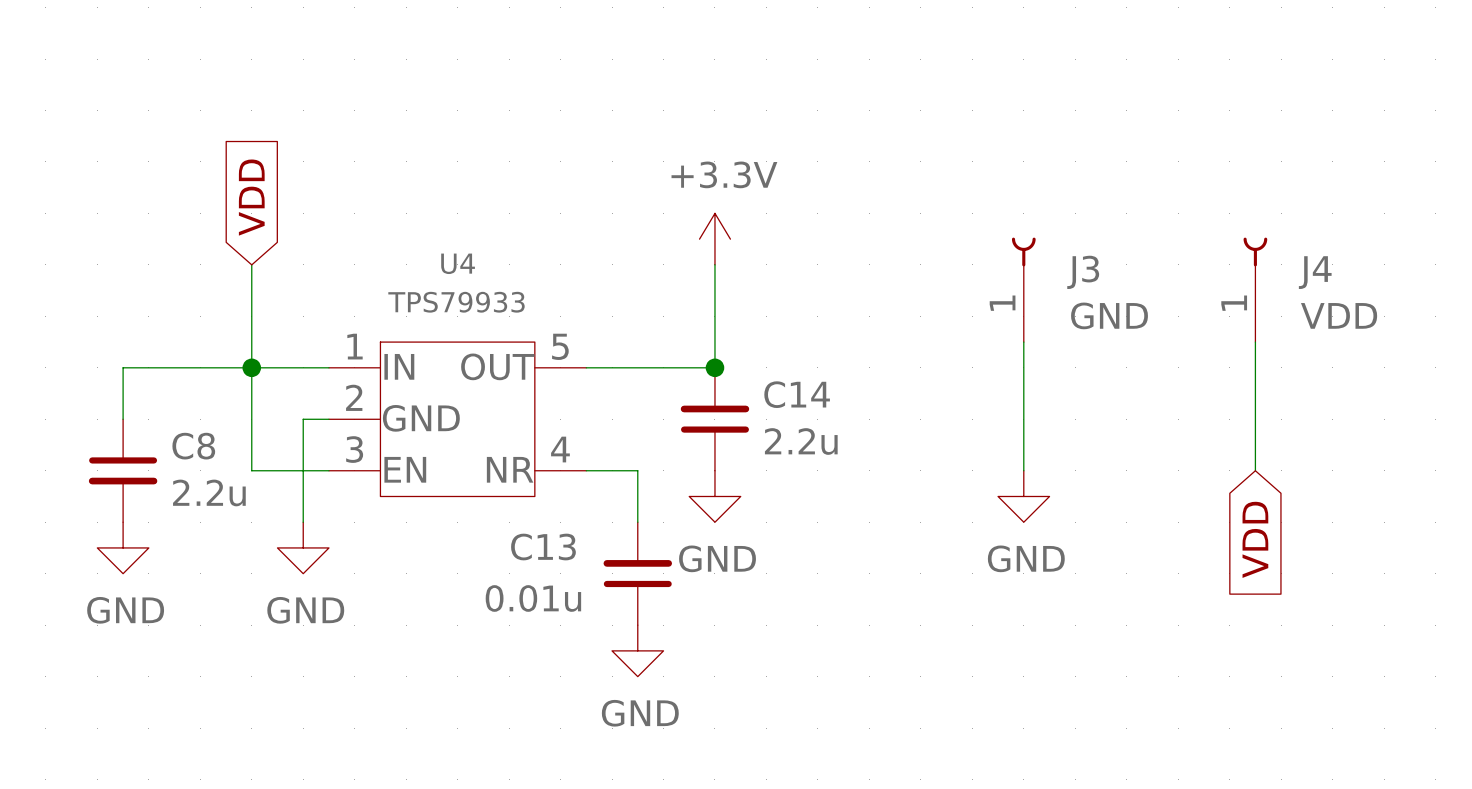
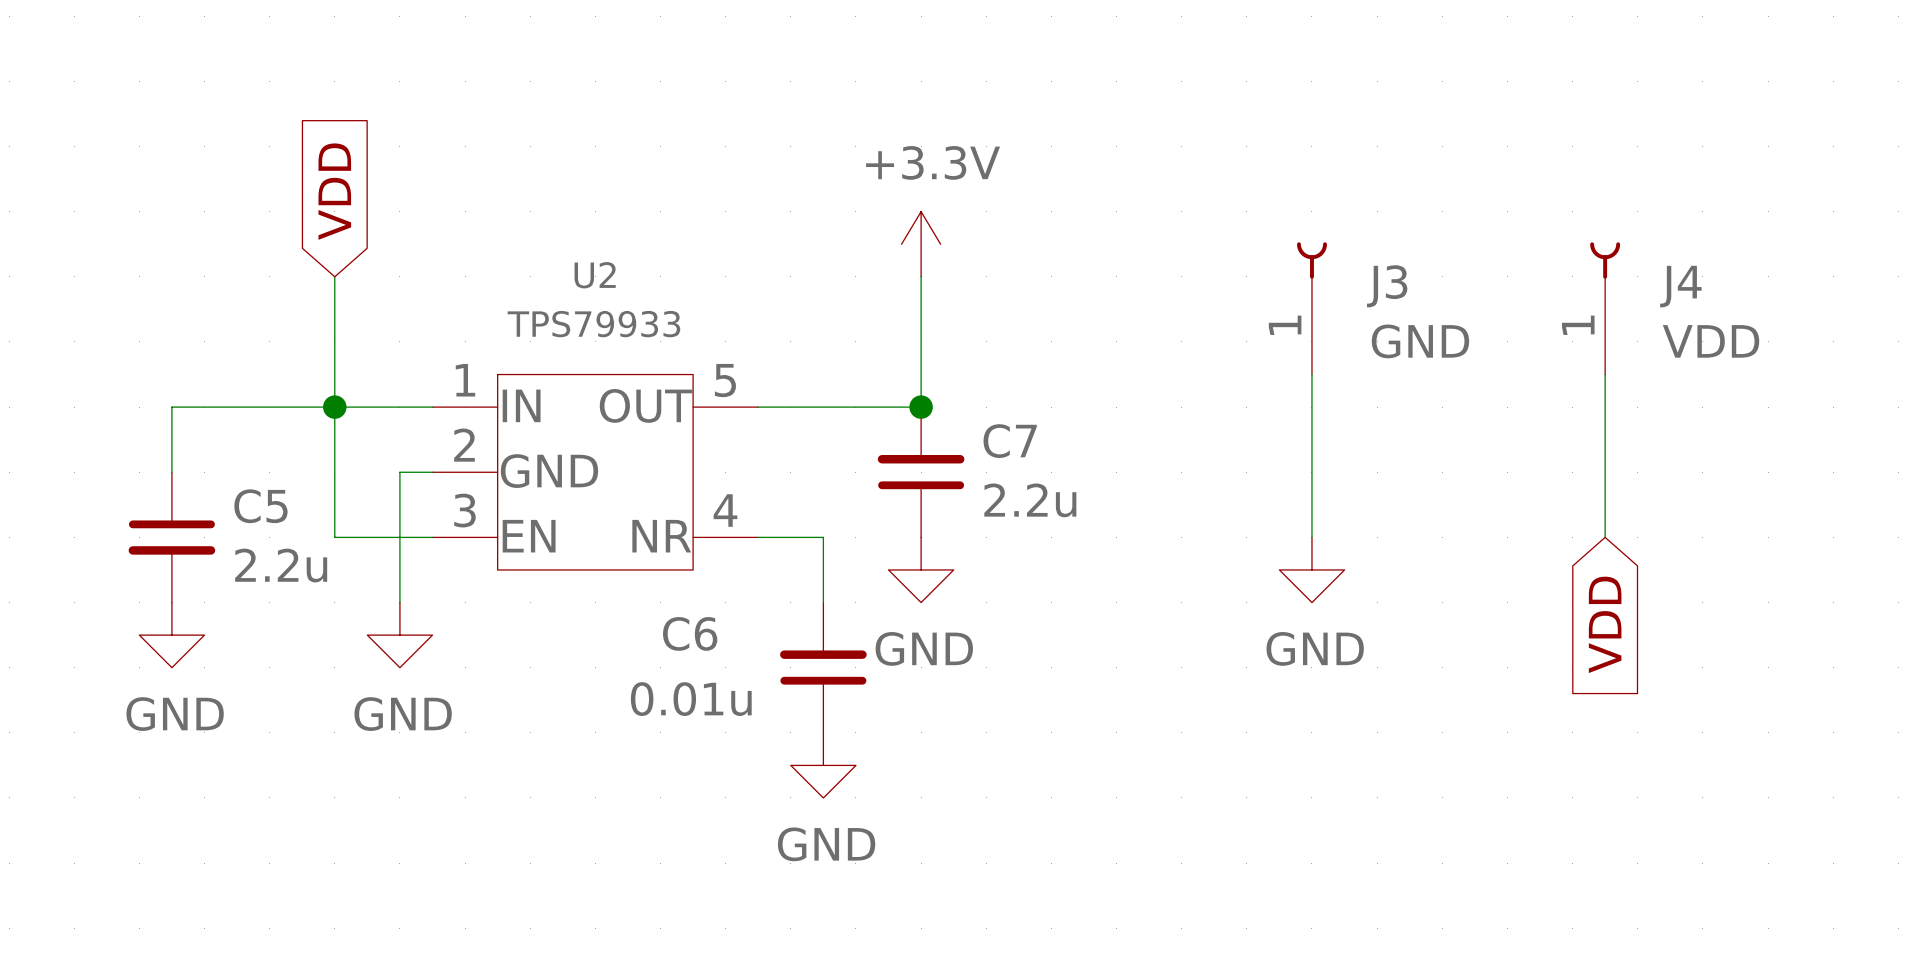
U4 name: U4 (458, 263) -> U2 (595, 275)
C14 name: C14 (797, 394) -> C7 (1010, 441)
C8 name: C8 (193, 446) -> C5 (260, 506)
C13 name: C13 (543, 547) -> C6 (690, 633)

